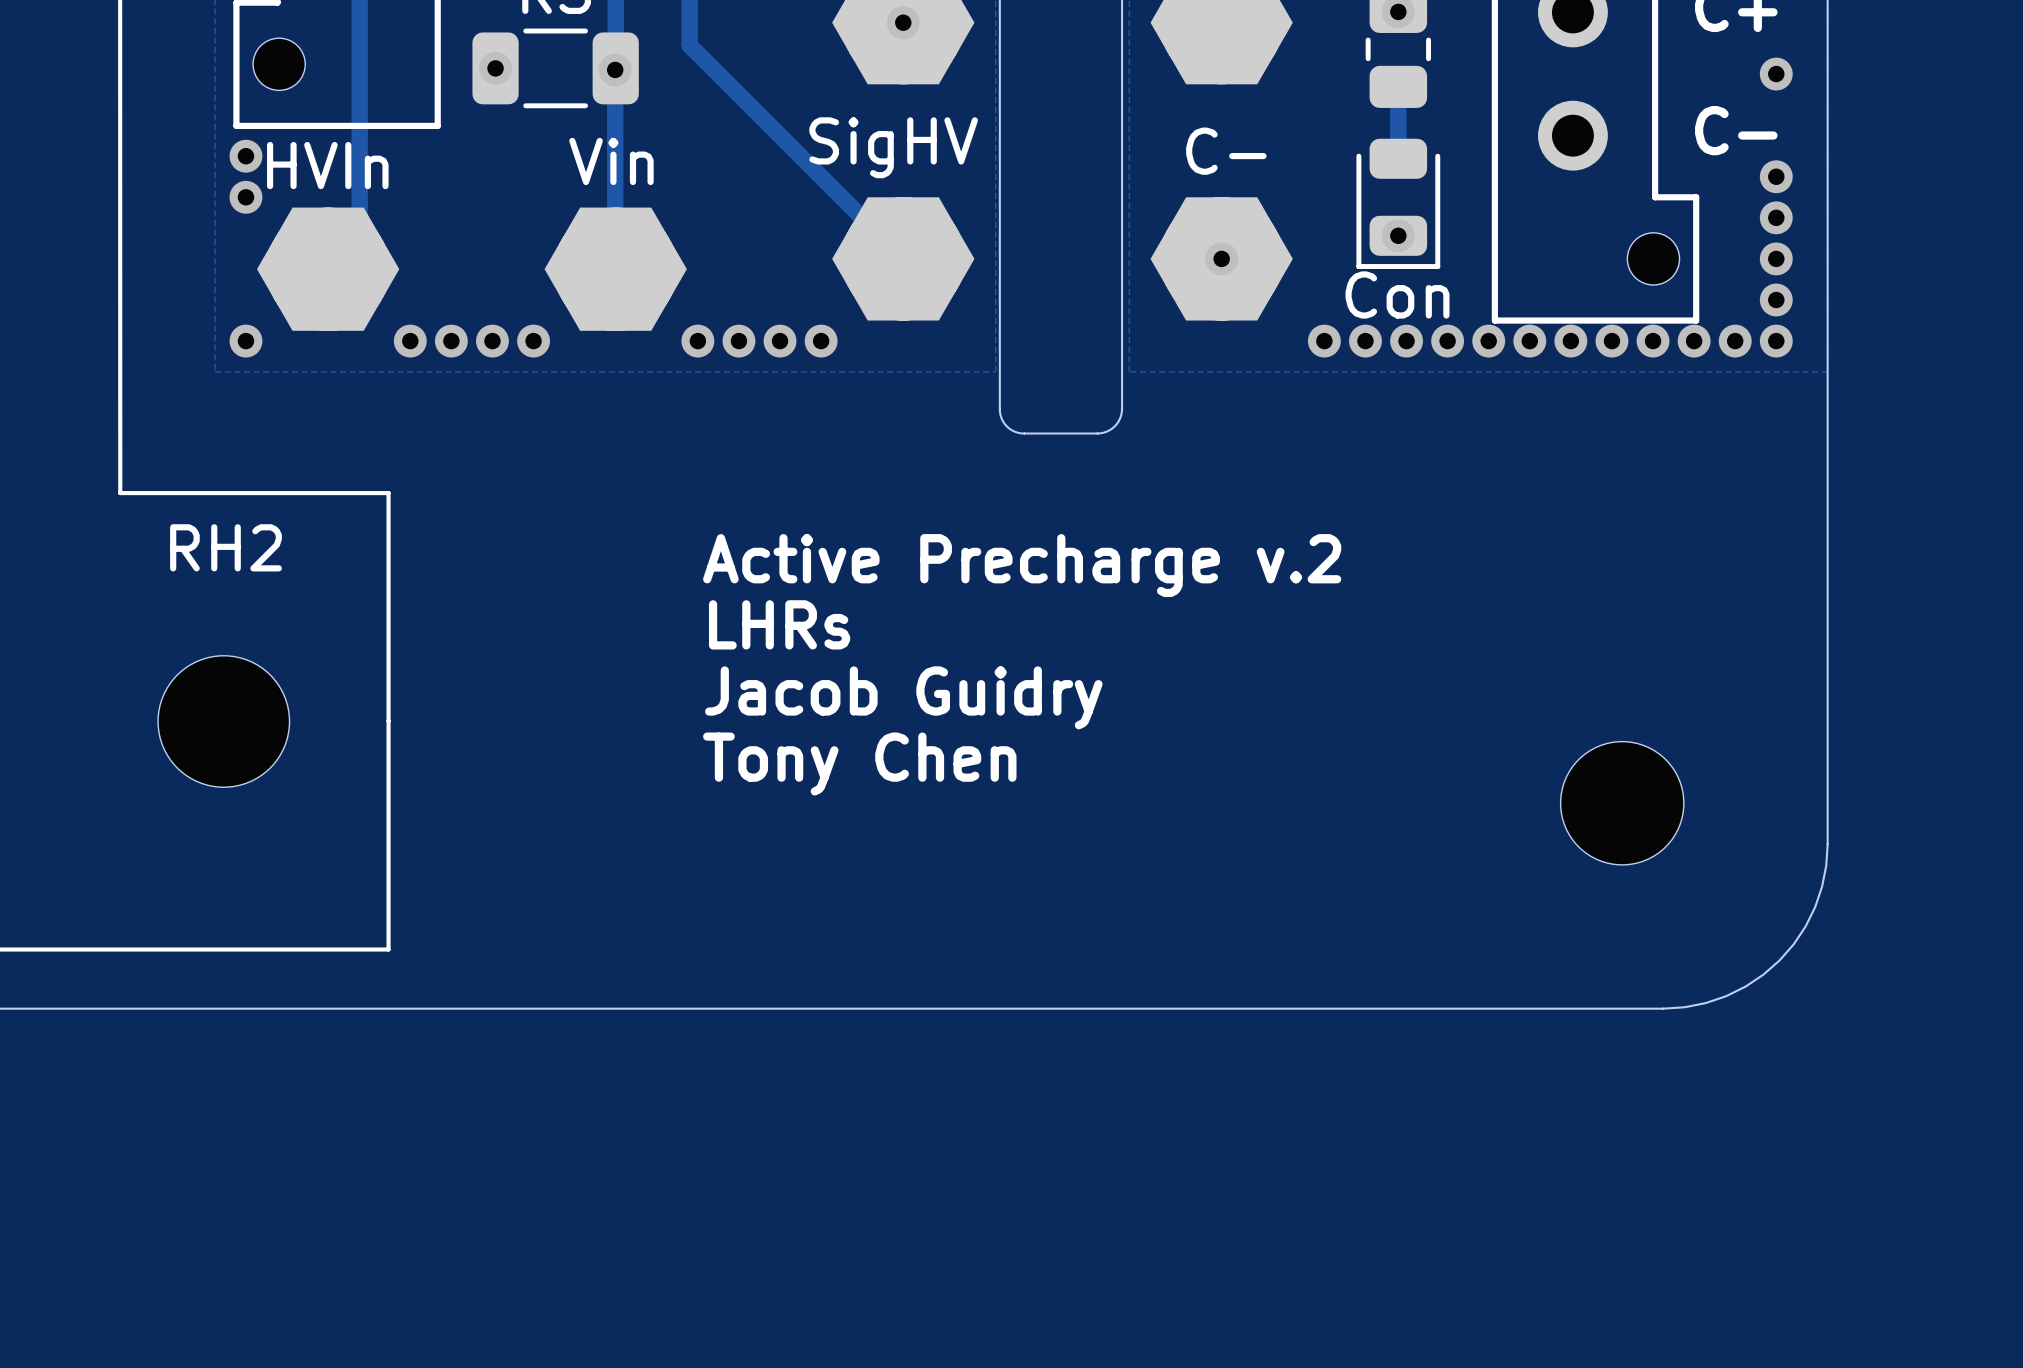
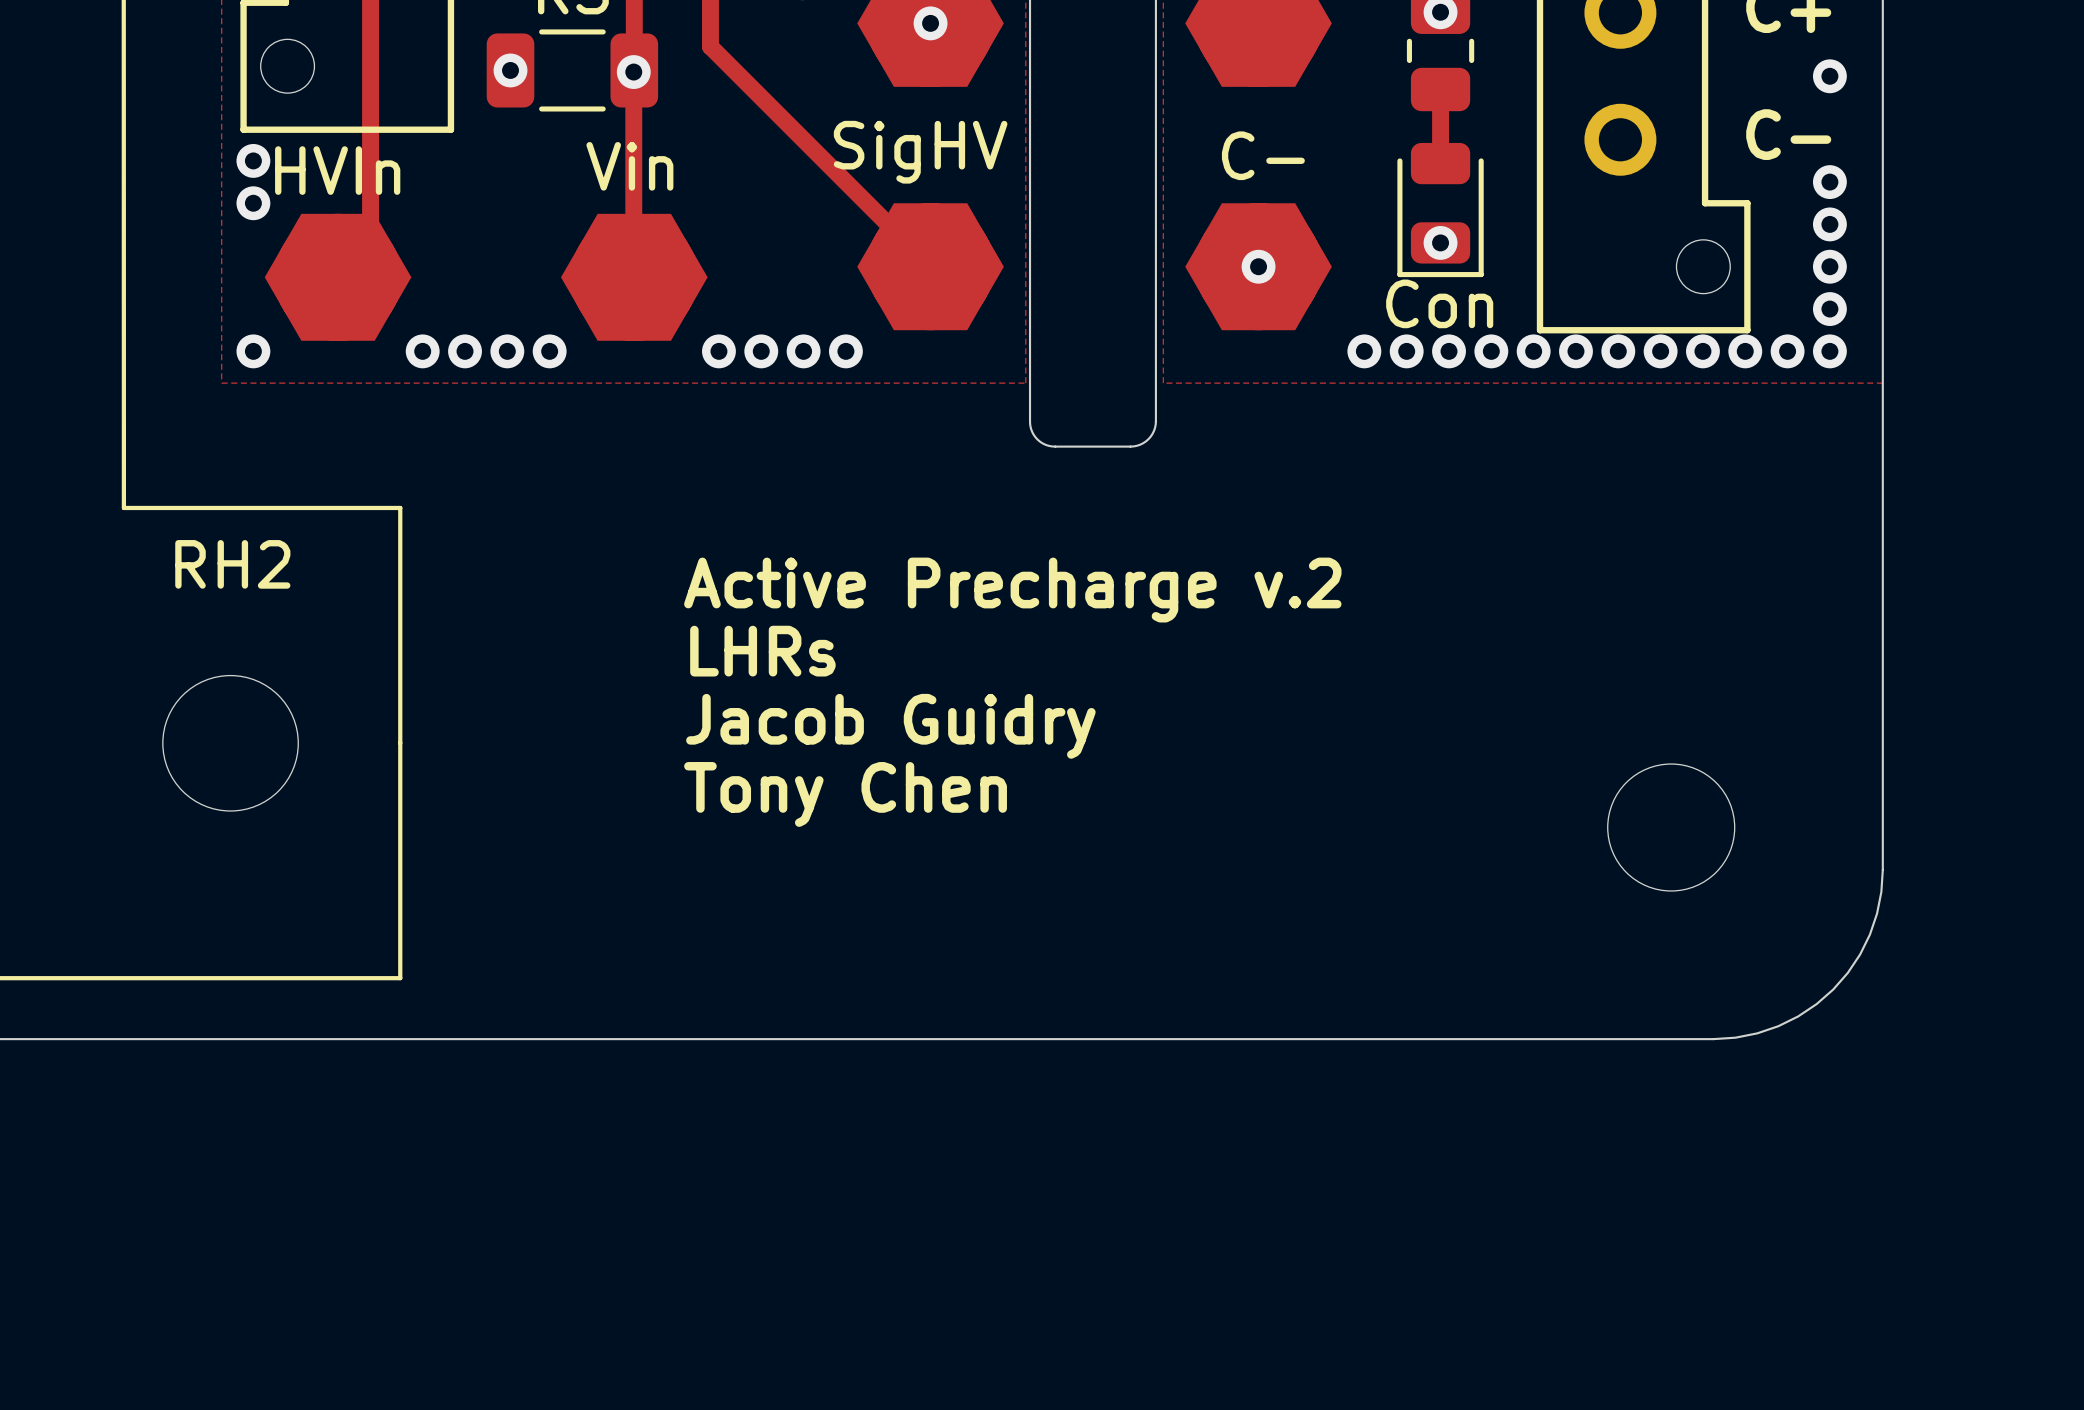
text position: Active Precharge v.2 (1022, 565) -> Active Precharge v.2 (1012, 590)
text position: LHRs (779, 624) -> LHRs (762, 651)
text position: Jacob Guidry (903, 697) -> Jacob Guidry (890, 726)
text position: Tony Chen (859, 763) -> Tony Chen (845, 794)

